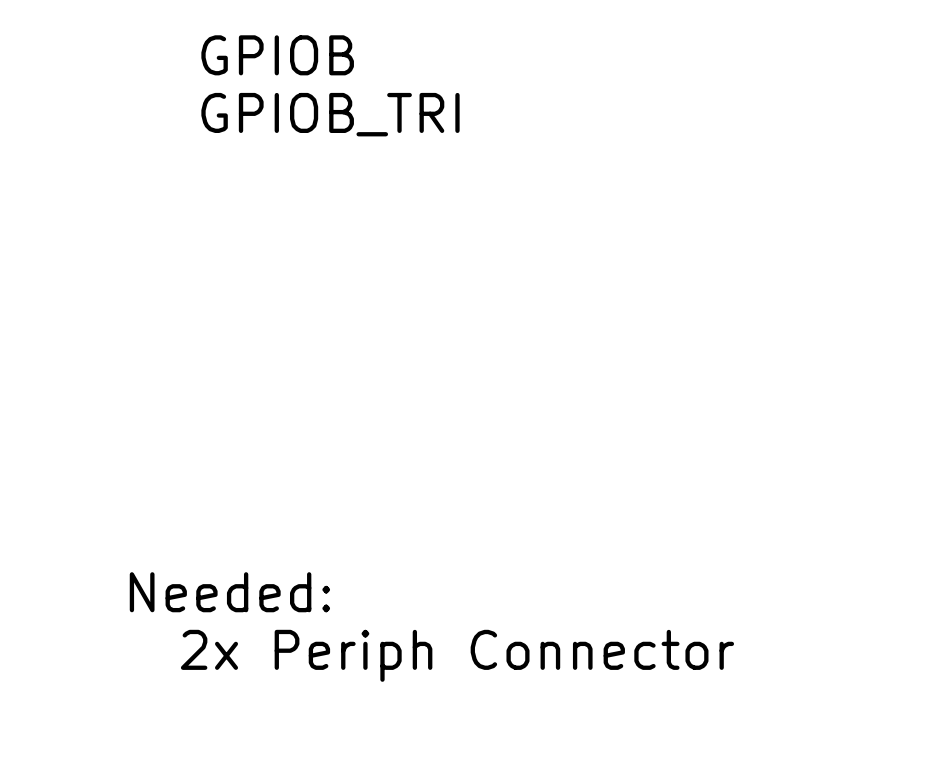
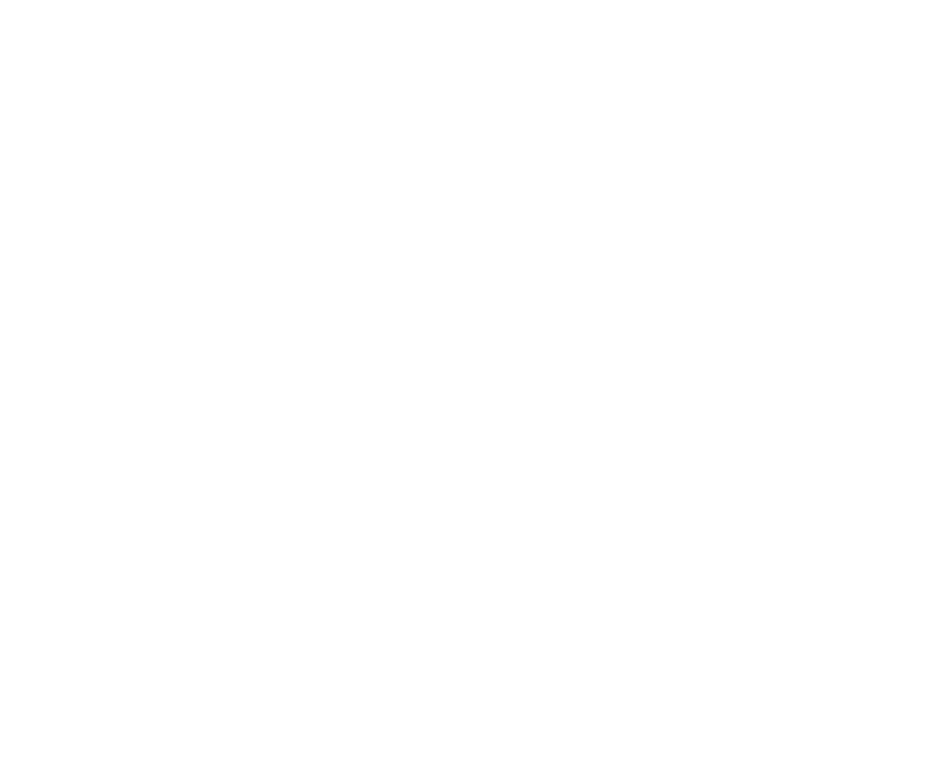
text: GPIOB (277, 55) -> none
text: GPIOB_TRI (330, 114) -> none
text: Needed: (229, 592) -> none
text: 2x Periph Connector (457, 655) -> none

